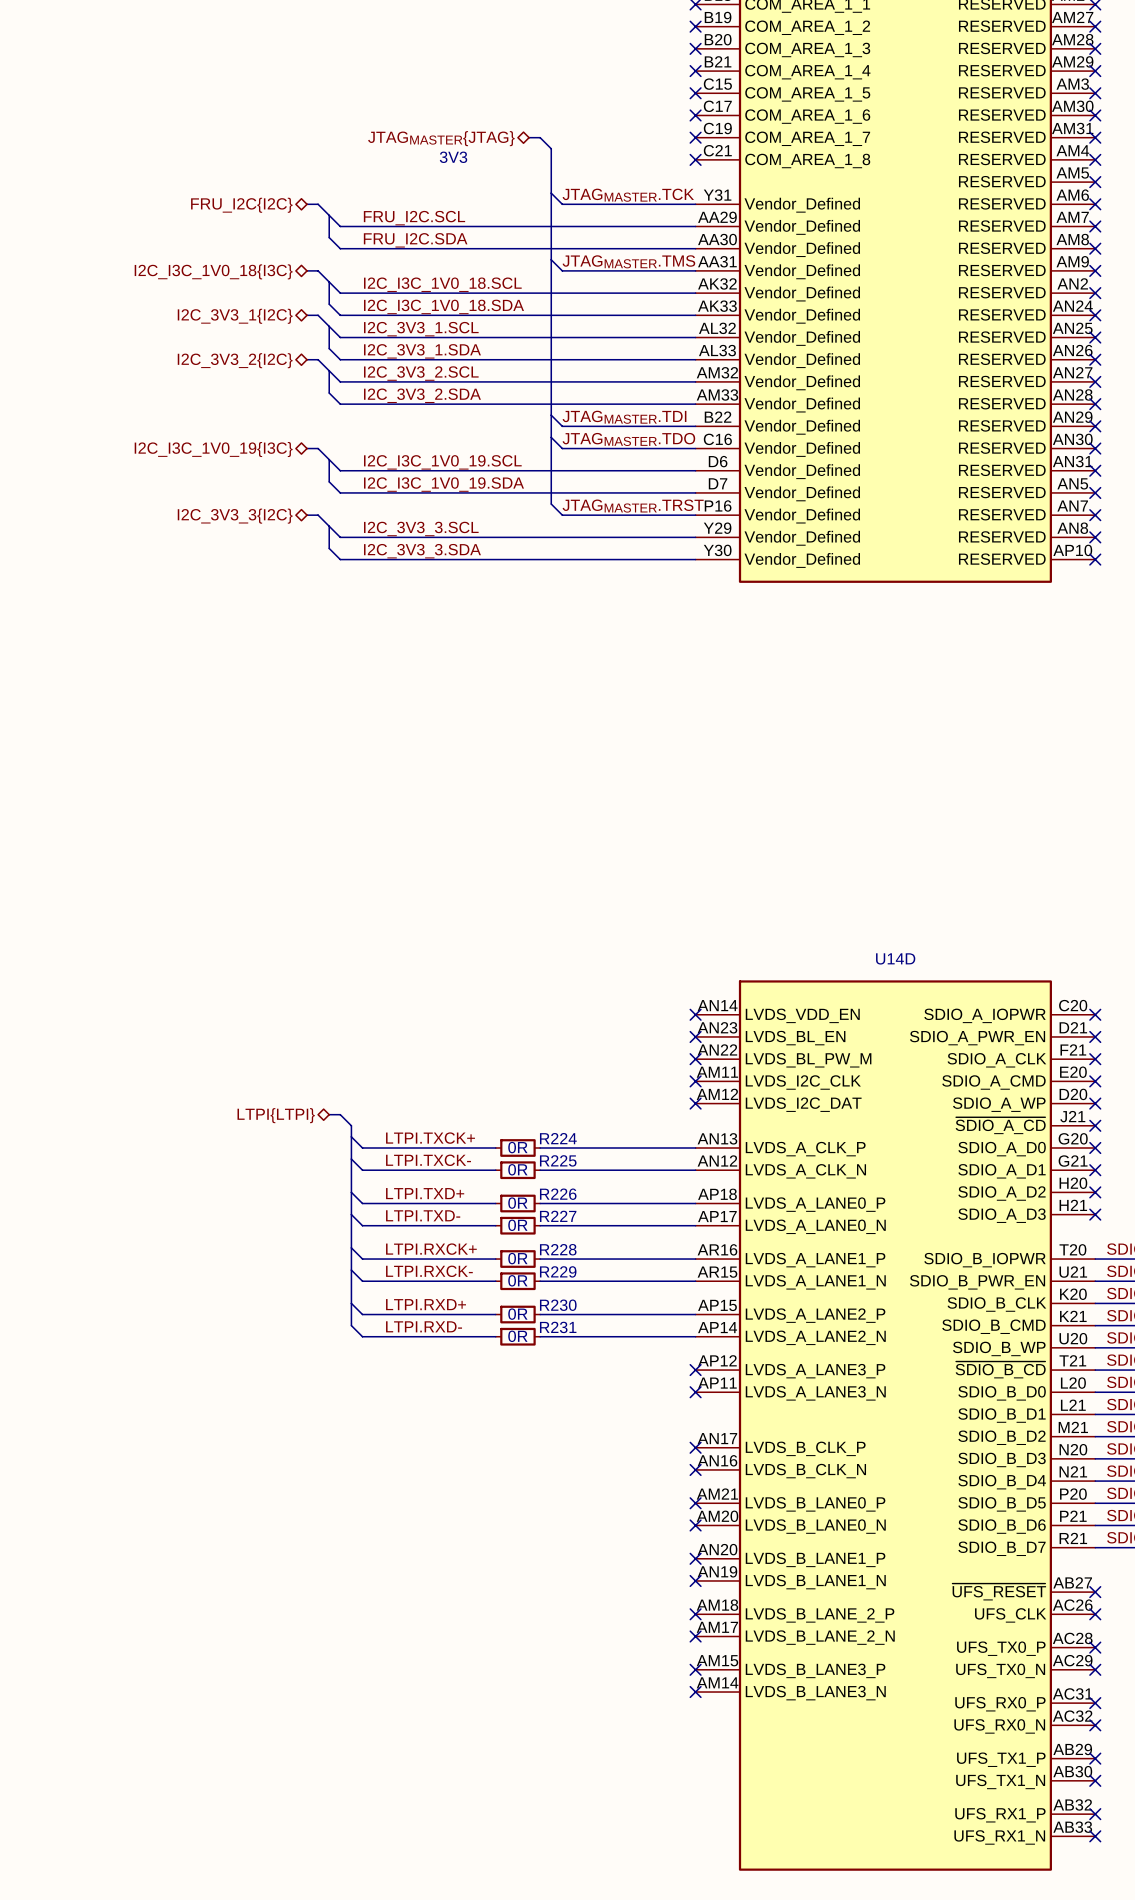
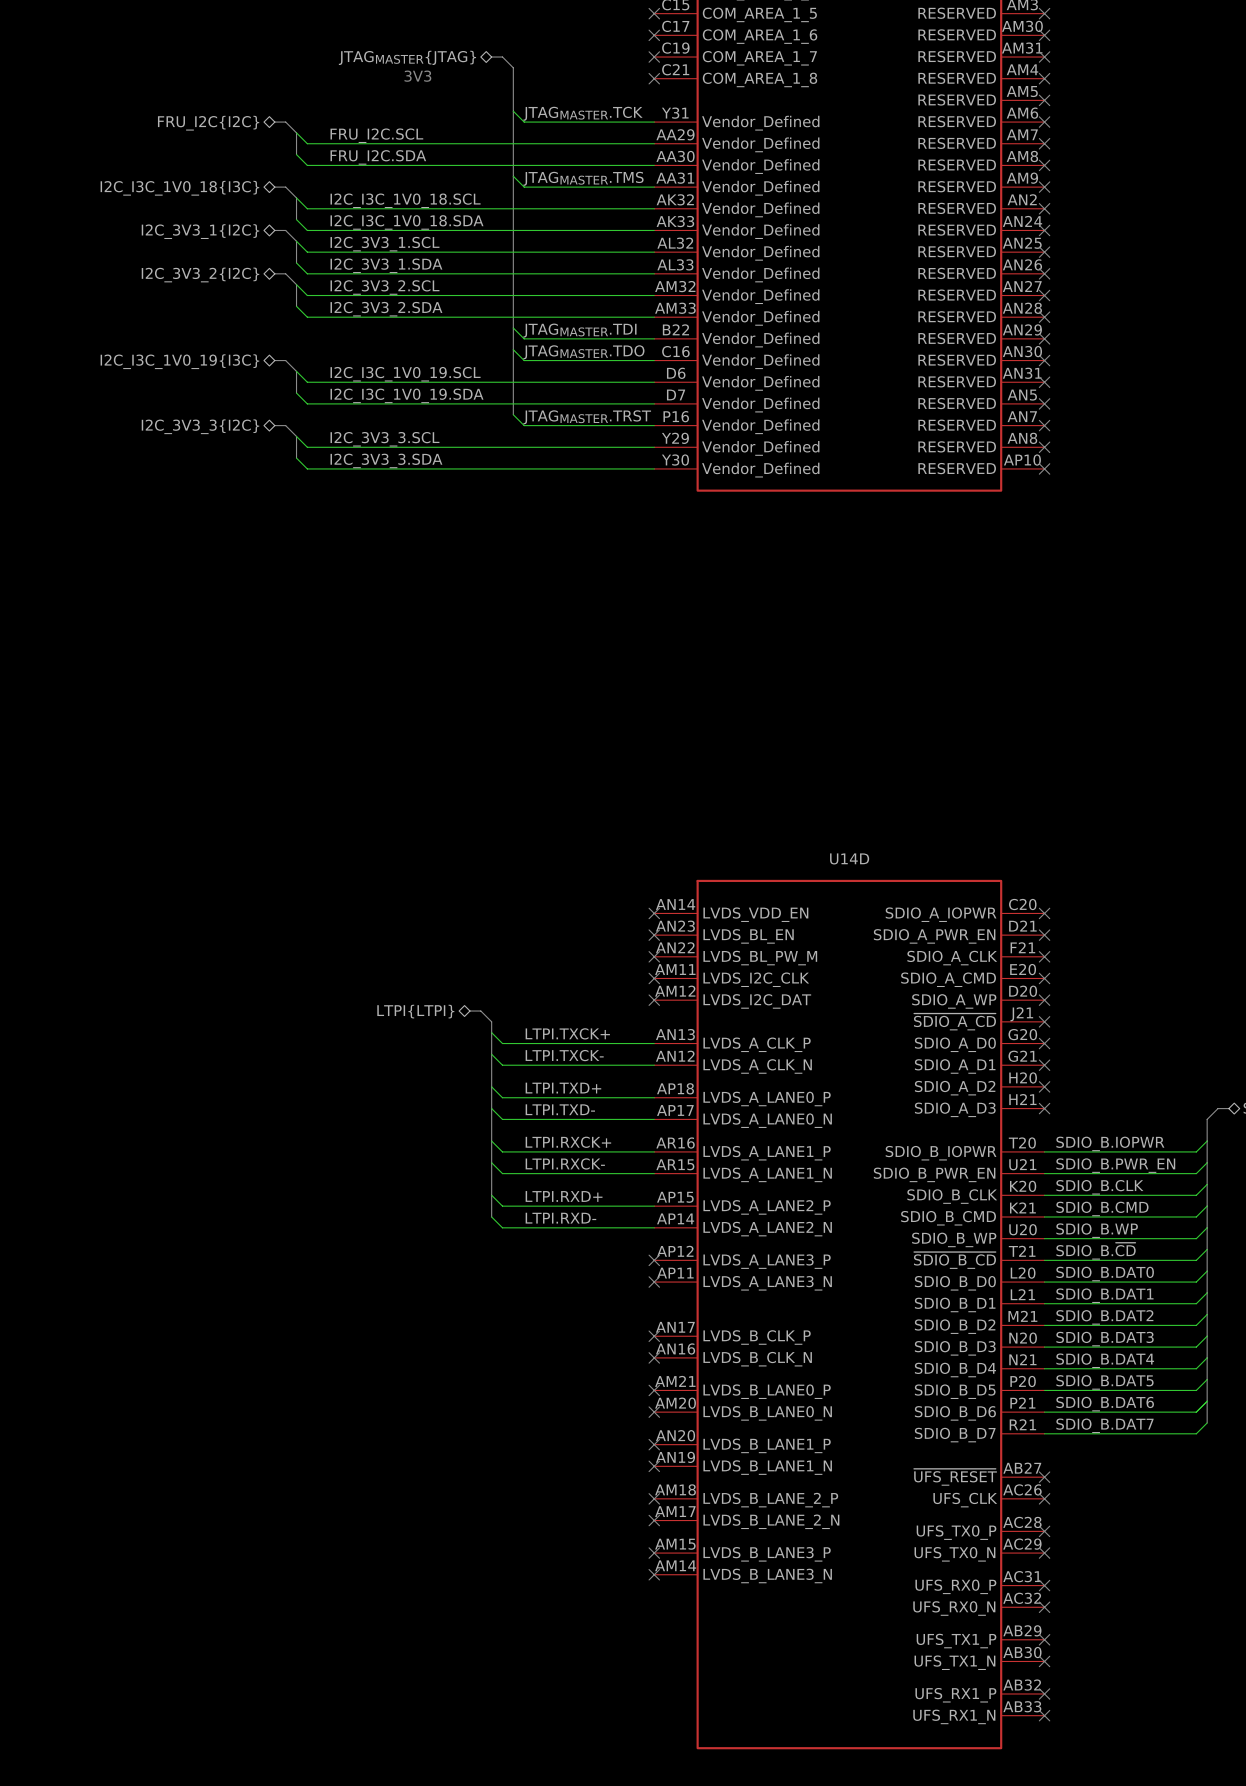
bus: (329, 1114) (340, 1114) (351, 1125) (351, 1325) -> (469, 1011) (480, 1011) (491, 1021) (491, 1216)
hierarchical label position: LTPI{LTPI} (276, 1115) -> LTPI{LTPI} (415, 1011)
wire: (351, 1136) (362, 1147) (495, 1147) -> none
wire: none -> (491, 1032) (502, 1043)
label position: LTPI.TXCK+ (430, 1138) -> LTPI.TXCK+ (567, 1033)
R224: (517, 1147) -> none
wire: (351, 1159) (362, 1170) (495, 1170) -> none
wire: none -> (491, 1054) (502, 1065)
label position: LTPI.TXCK- (428, 1160) -> LTPI.TXCK- (564, 1055)
R225: (517, 1170) -> none
wire: (351, 1192) (362, 1203) (495, 1203) -> none
wire: none -> (491, 1086) (502, 1097)
label position: LTPI.TXD+ (425, 1193) -> LTPI.TXD+ (563, 1088)
R226: (517, 1203) -> none
wire: (351, 1214) (362, 1225) (495, 1225) -> none
wire: none -> (491, 1108) (502, 1119)
label position: LTPI.TXD- (423, 1215) -> LTPI.TXD- (560, 1109)
R227: (517, 1225) -> none
wire: (351, 1247) (362, 1259) (495, 1259) -> none
wire: none -> (491, 1141) (502, 1151)
label position: LTPI.RXCK+ (431, 1249) -> LTPI.RXCK+ (568, 1142)
R228: (517, 1259) -> none
wire: (351, 1270) (362, 1281) (495, 1281) -> none
wire: none -> (491, 1162) (502, 1173)
label position: LTPI.RXCK- (429, 1271) -> LTPI.RXCK- (565, 1163)
R229: (517, 1281) -> none
wire: (351, 1303) (362, 1314) (495, 1314) -> none
wire: none -> (491, 1195) (502, 1206)
label position: LTPI.RXD+ (426, 1304) -> LTPI.RXD+ (564, 1196)
R230: (517, 1314) -> none
wire: (351, 1325) (362, 1336) (495, 1336) -> none
wire: none -> (491, 1216) (502, 1227)
label position: LTPI.RXD- (424, 1326) -> LTPI.RXD- (560, 1218)
R231: (517, 1336) -> none

